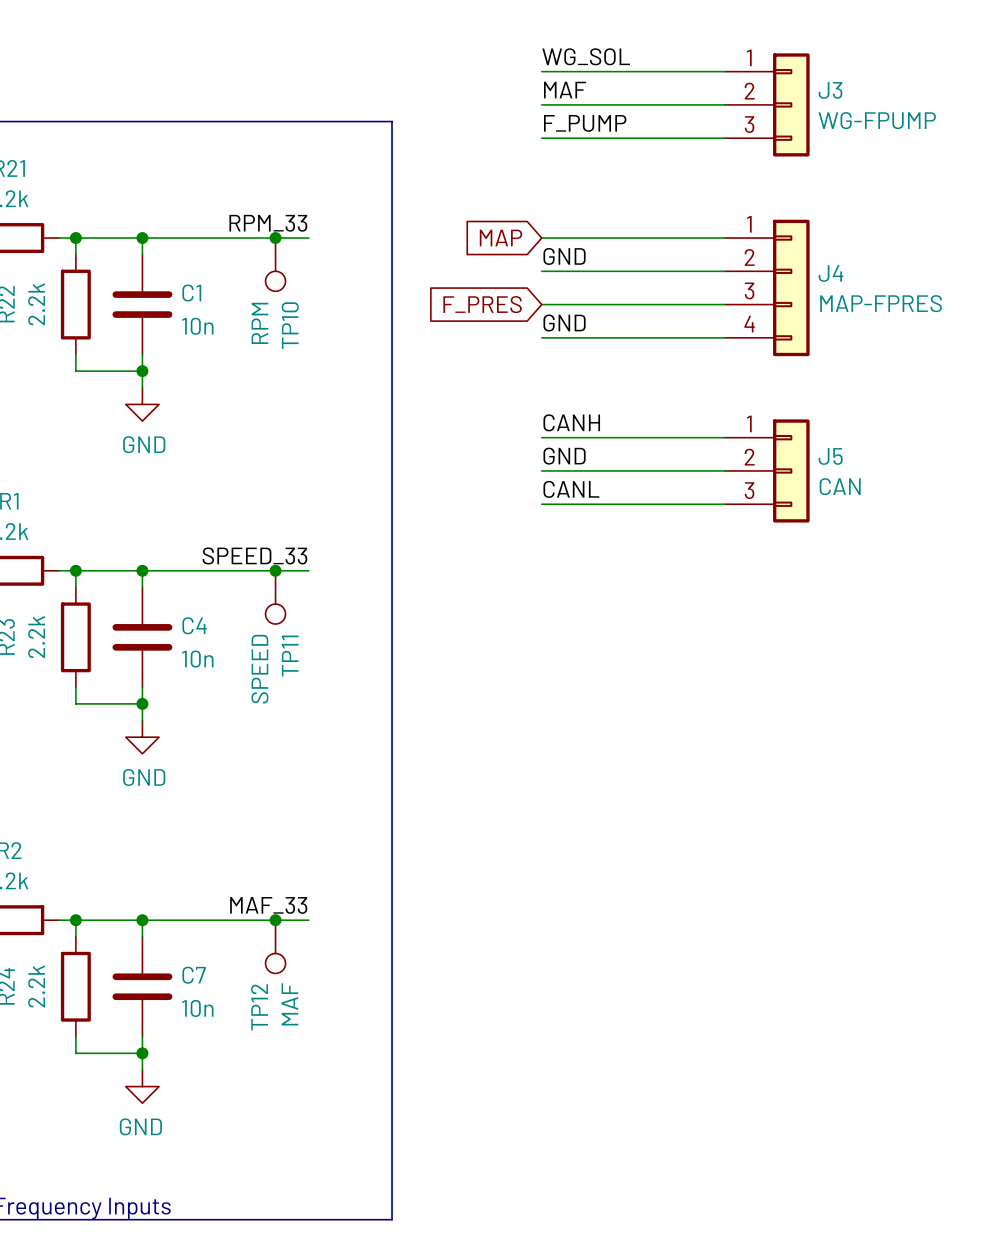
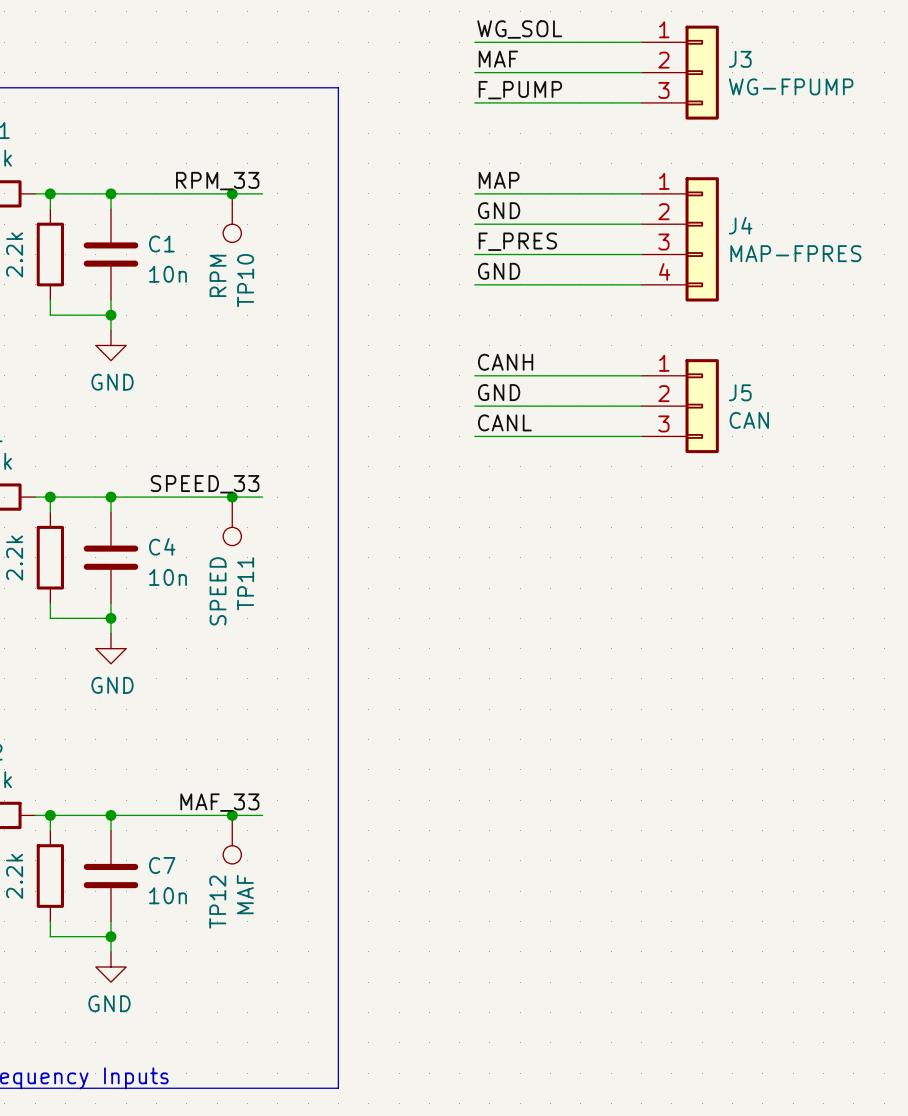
label: none -> MAP (499, 180)
global label: MAP (500, 238) -> none
label: none -> F_PRES (517, 241)
global label: F_PRES (482, 304) -> none

